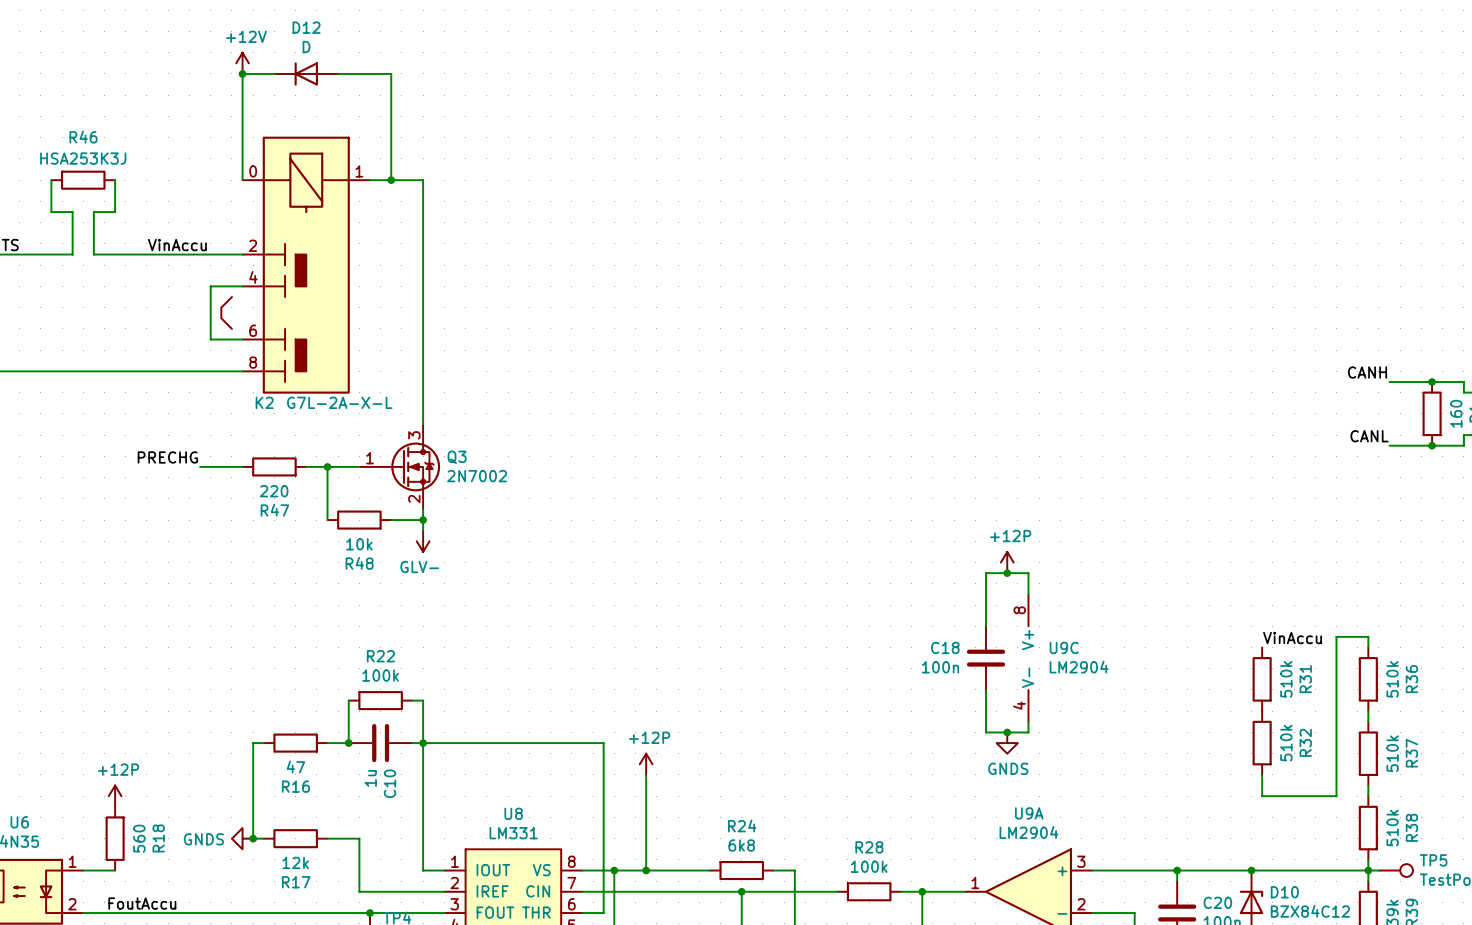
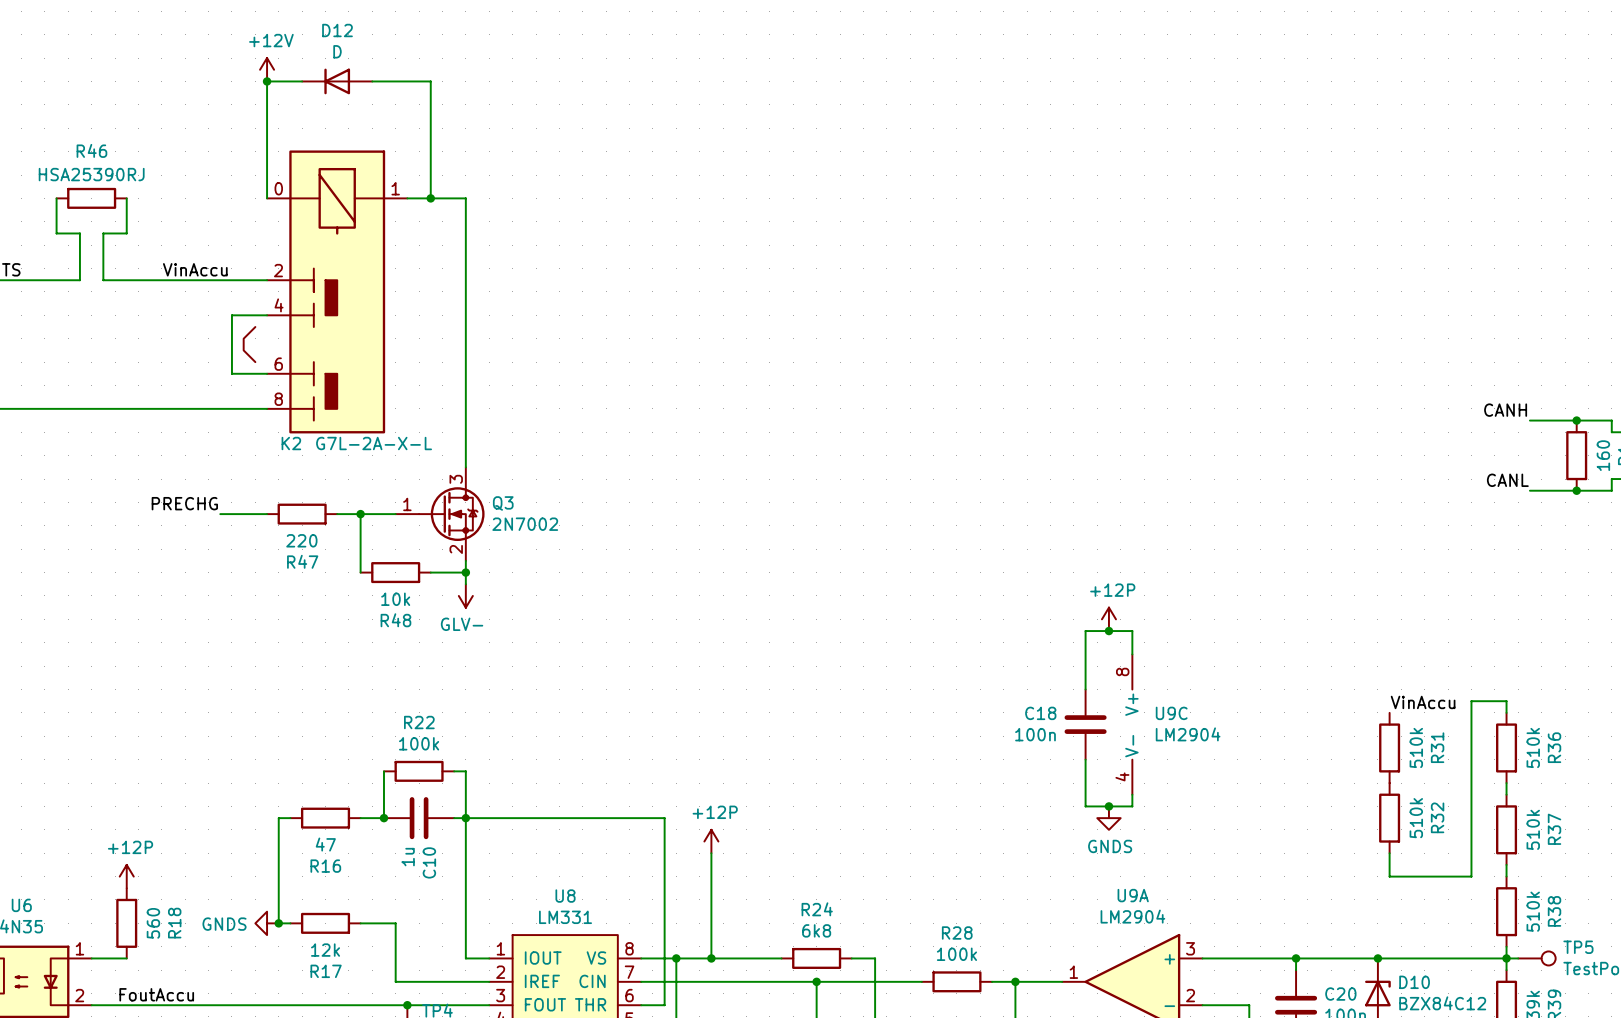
R46 value: HSA253K3J (83, 158) -> HSA25390RJ (91, 174)

